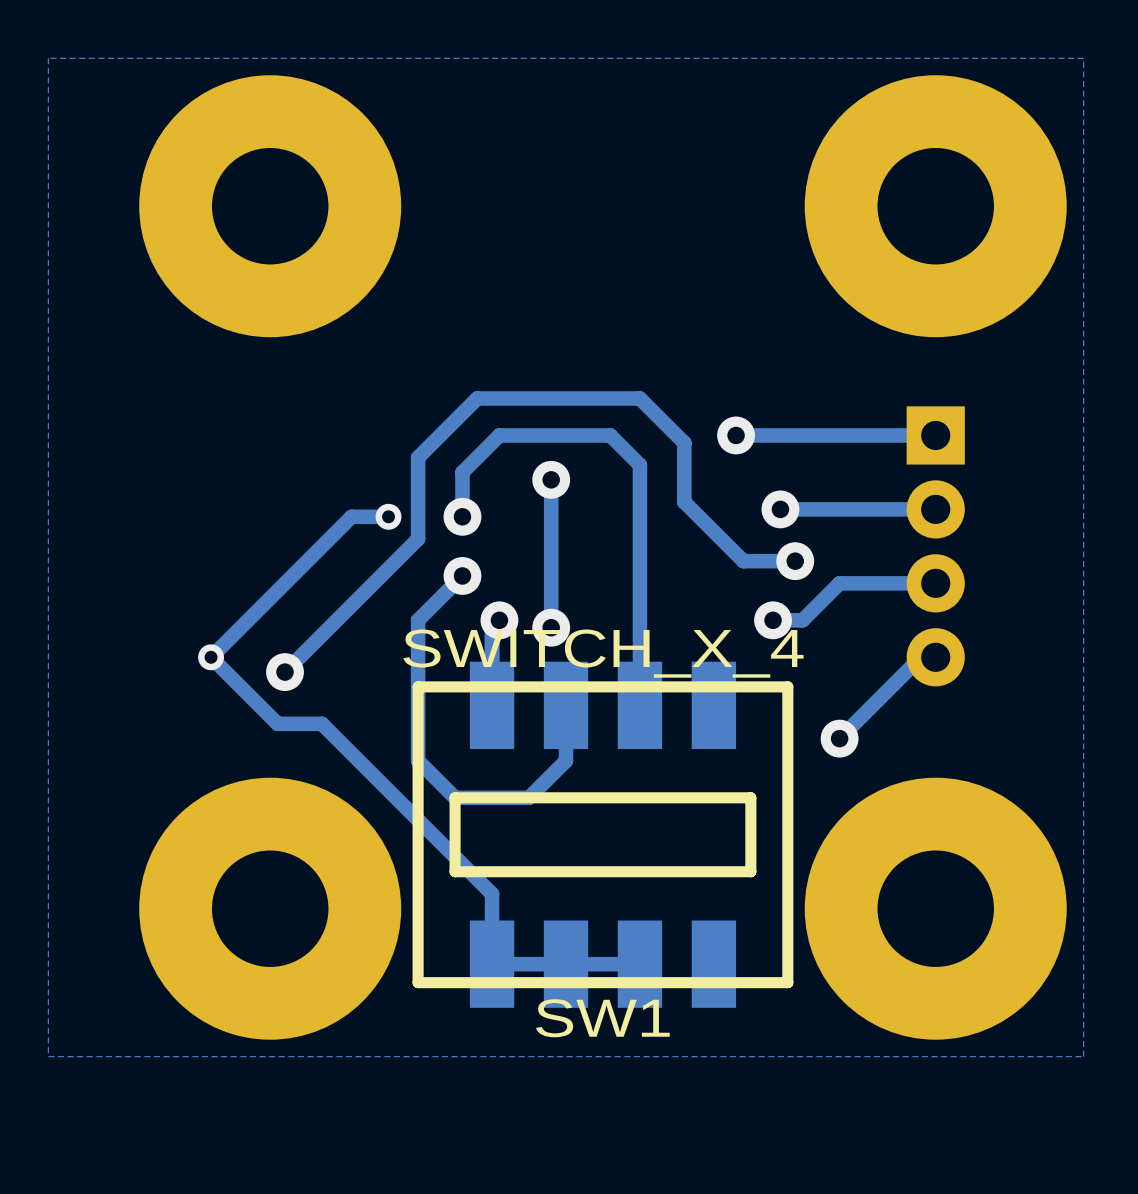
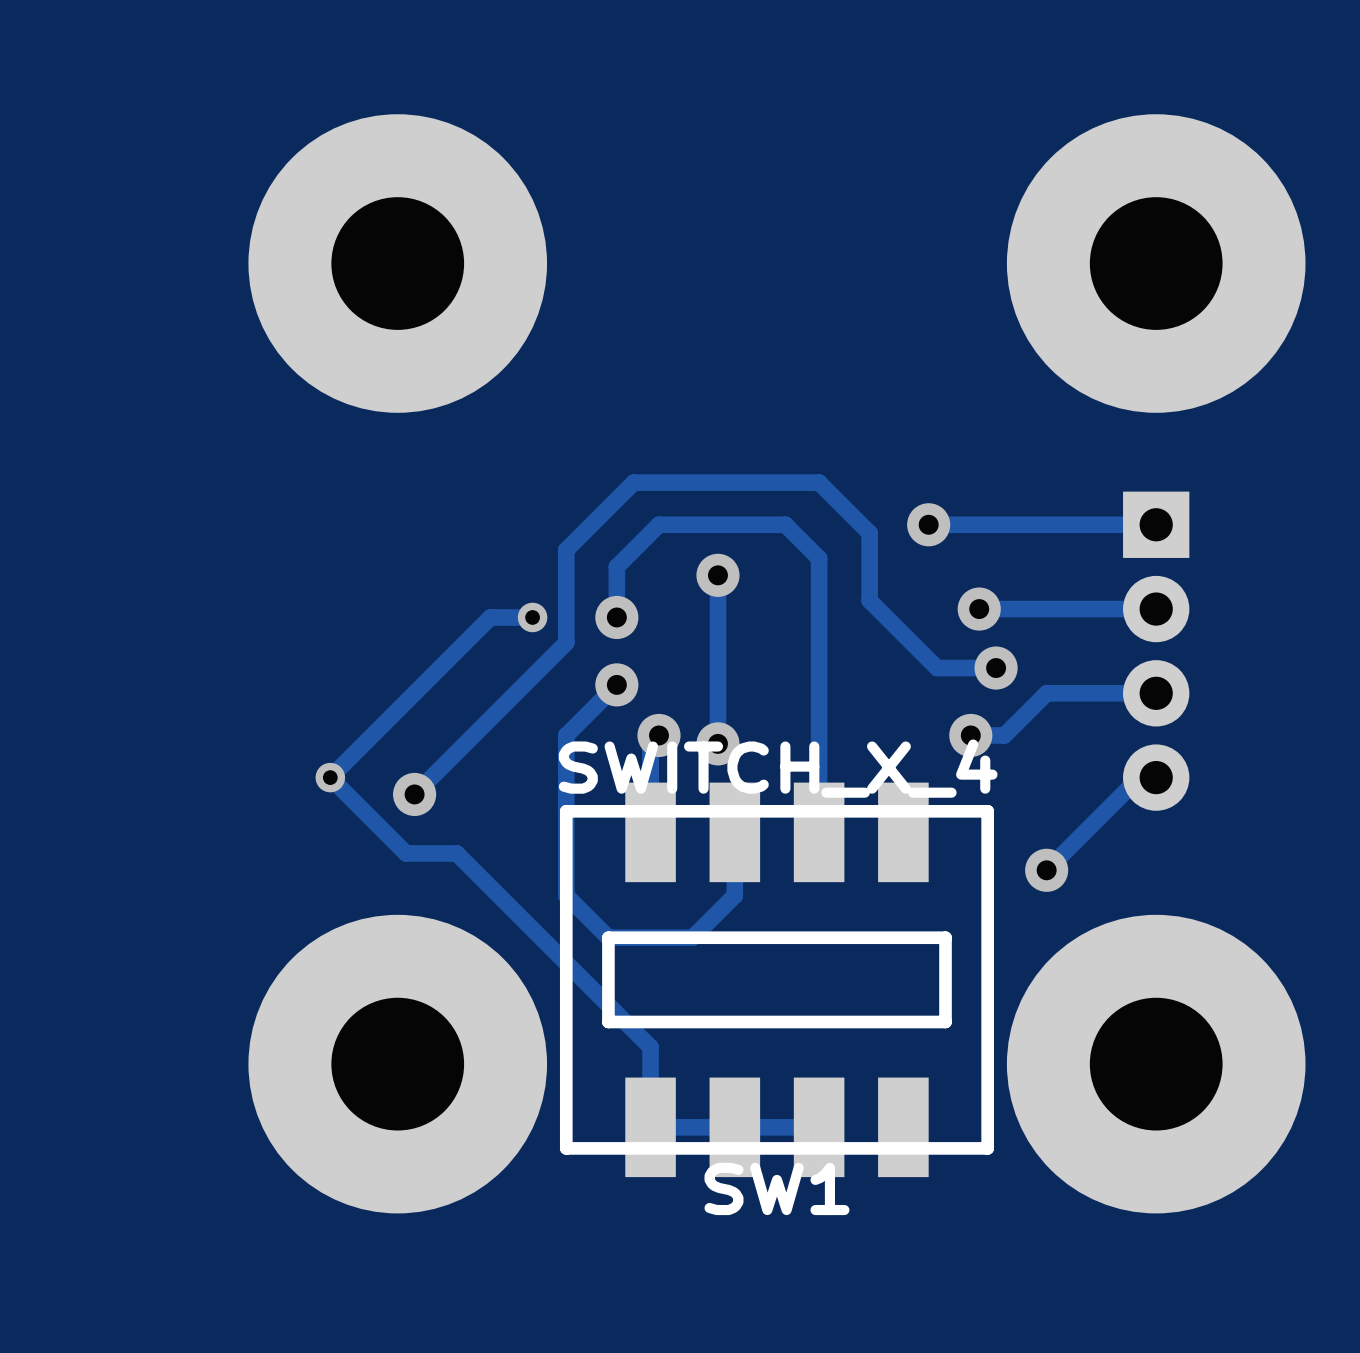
zone outline: (1083, 58) (48, 58) (48, 1056) (1083, 1056) (1083, 58) -> none

